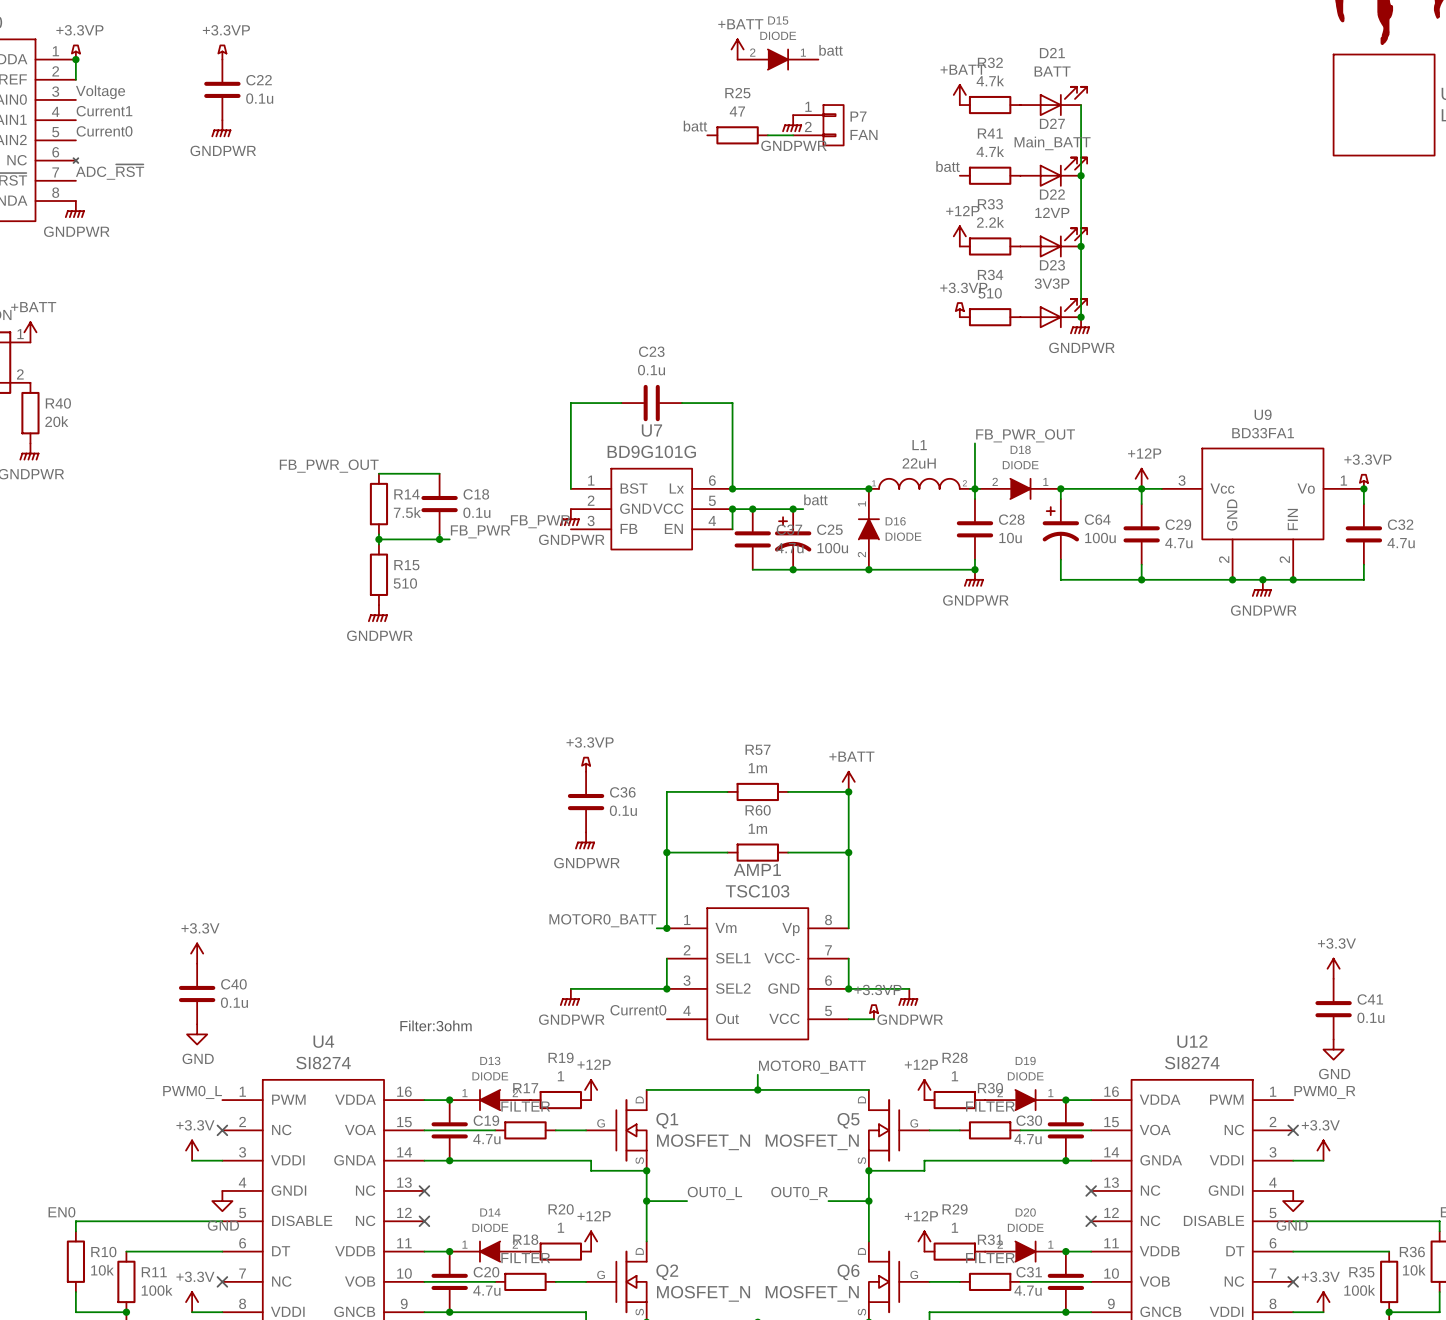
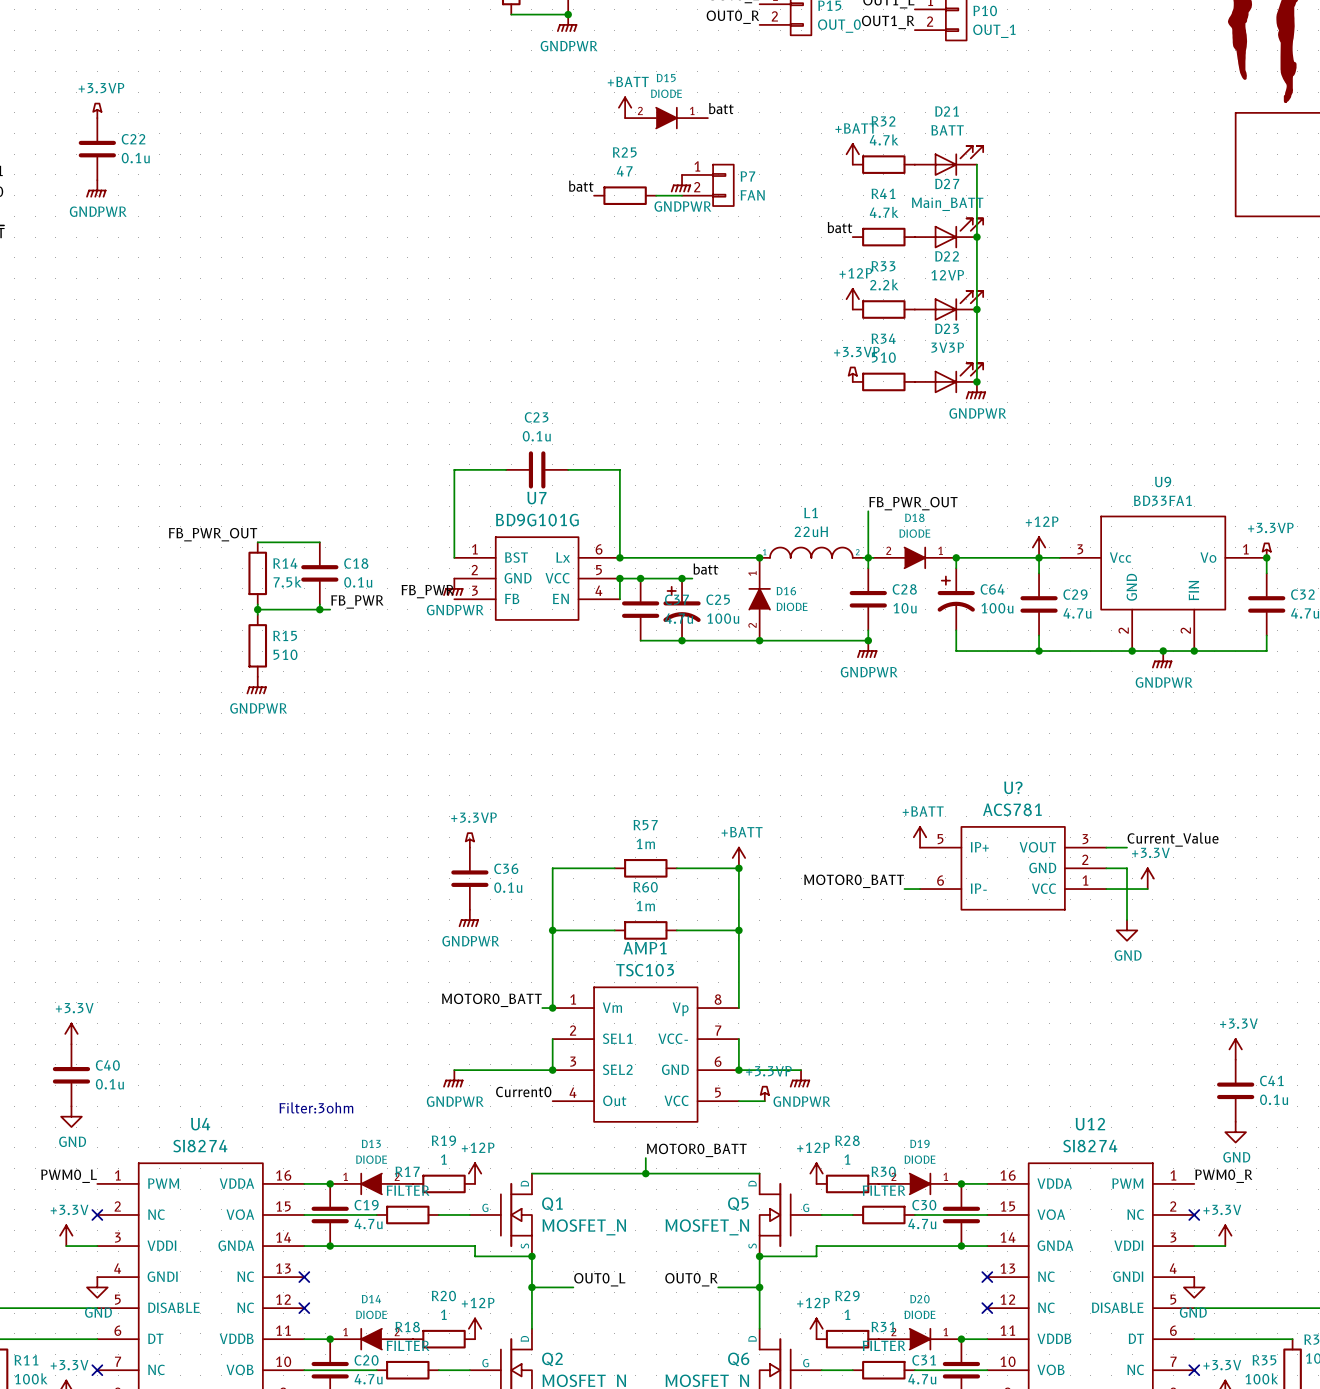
power symbol: none -> +BATT (920, 837)
label: none -> Current_Value (1173, 839)
wire: none -> (1106, 847) (1127, 847)
U?: none -> ACS781 (1013, 868)
wire: none -> (1106, 868) (1127, 868) (1127, 920)
power symbol: none -> +3.3V (1147, 878)
label: none -> MOTOR0_BATT (854, 881)
wire: none -> (904, 889) (920, 889)
wire: none -> (1106, 889) (1147, 889)
power symbol: none -> GND (1127, 930)

